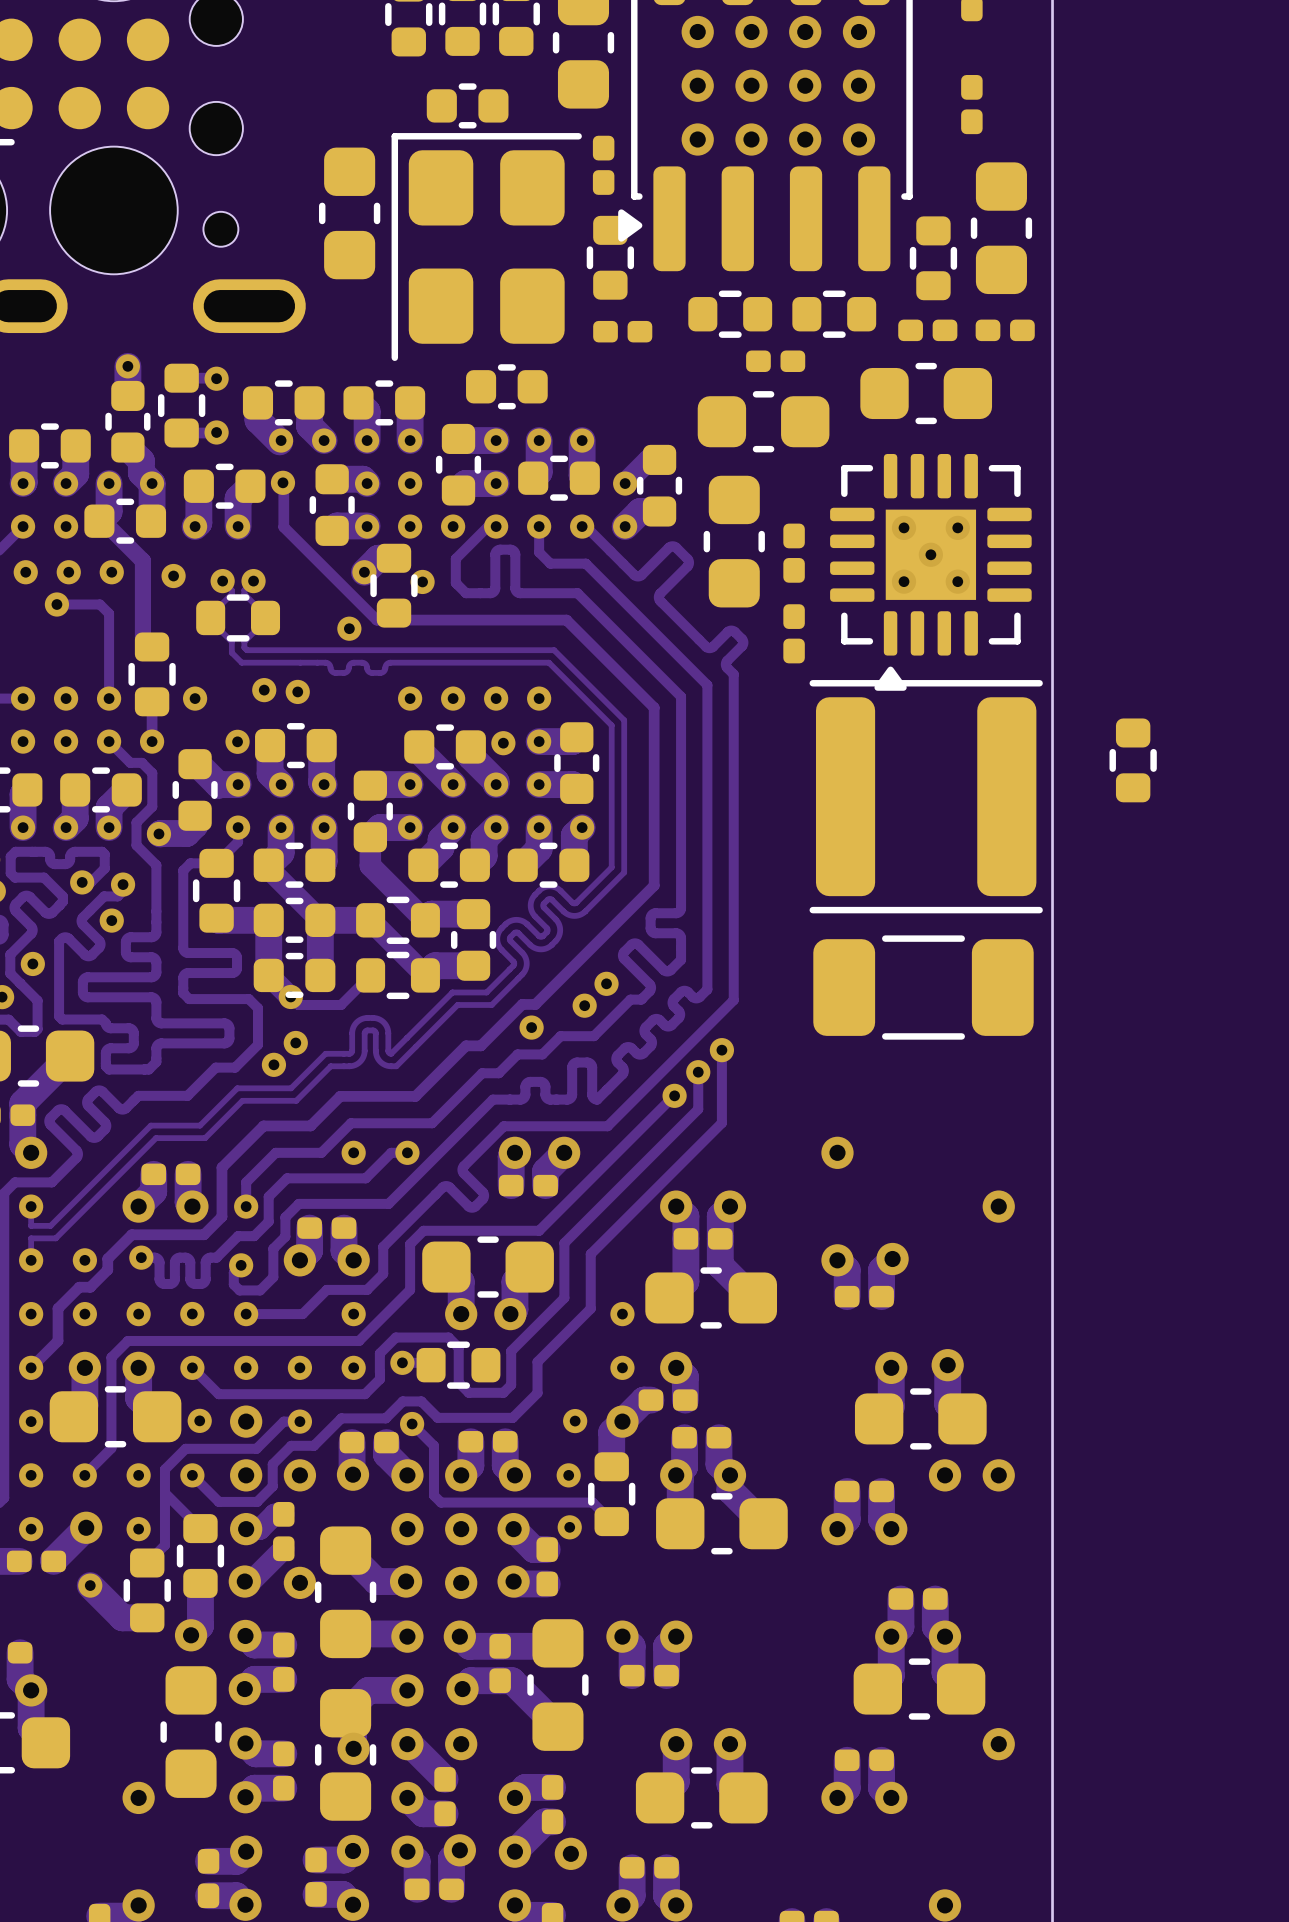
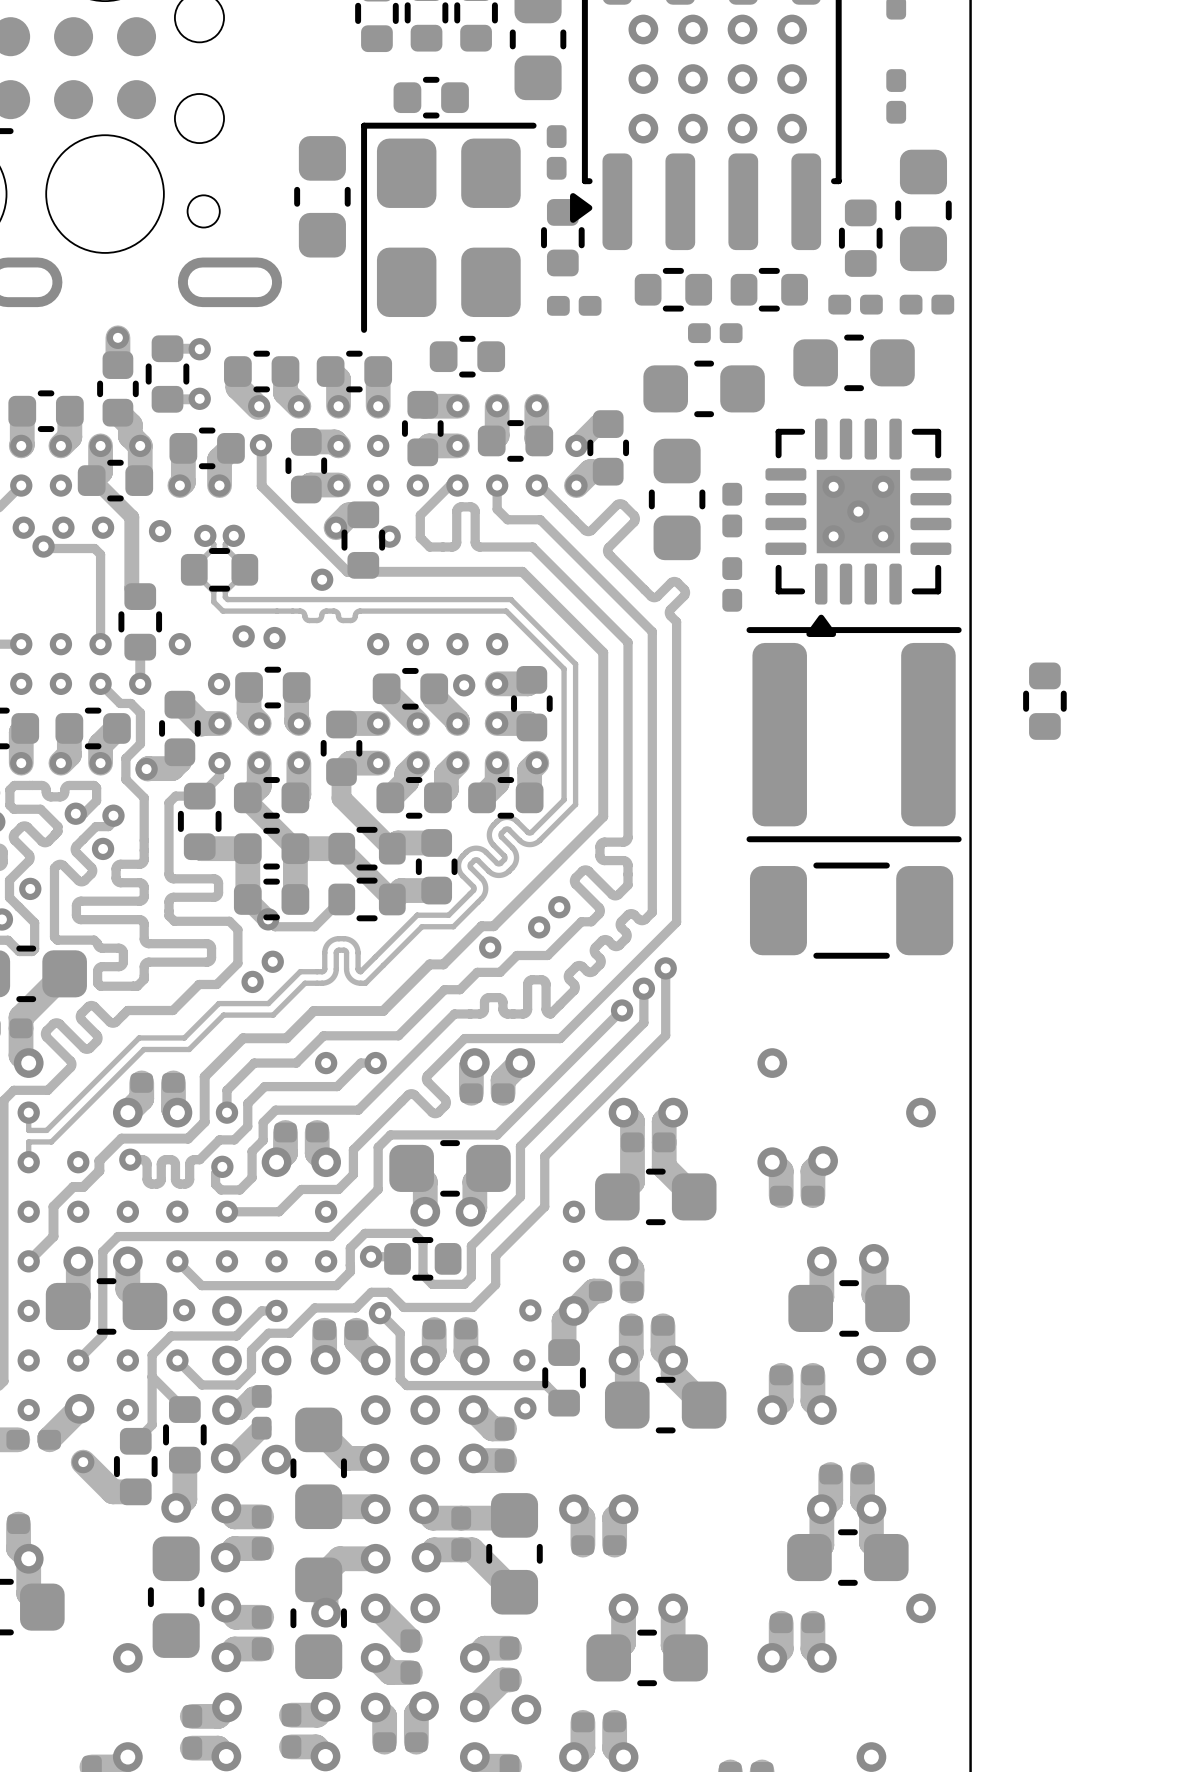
track: (56, 604) (99, 604) (109, 613) -> (43, 546) (45, 548) (94, 548) (100, 554) (100, 565)
via position: (56, 604) -> (43, 546)

